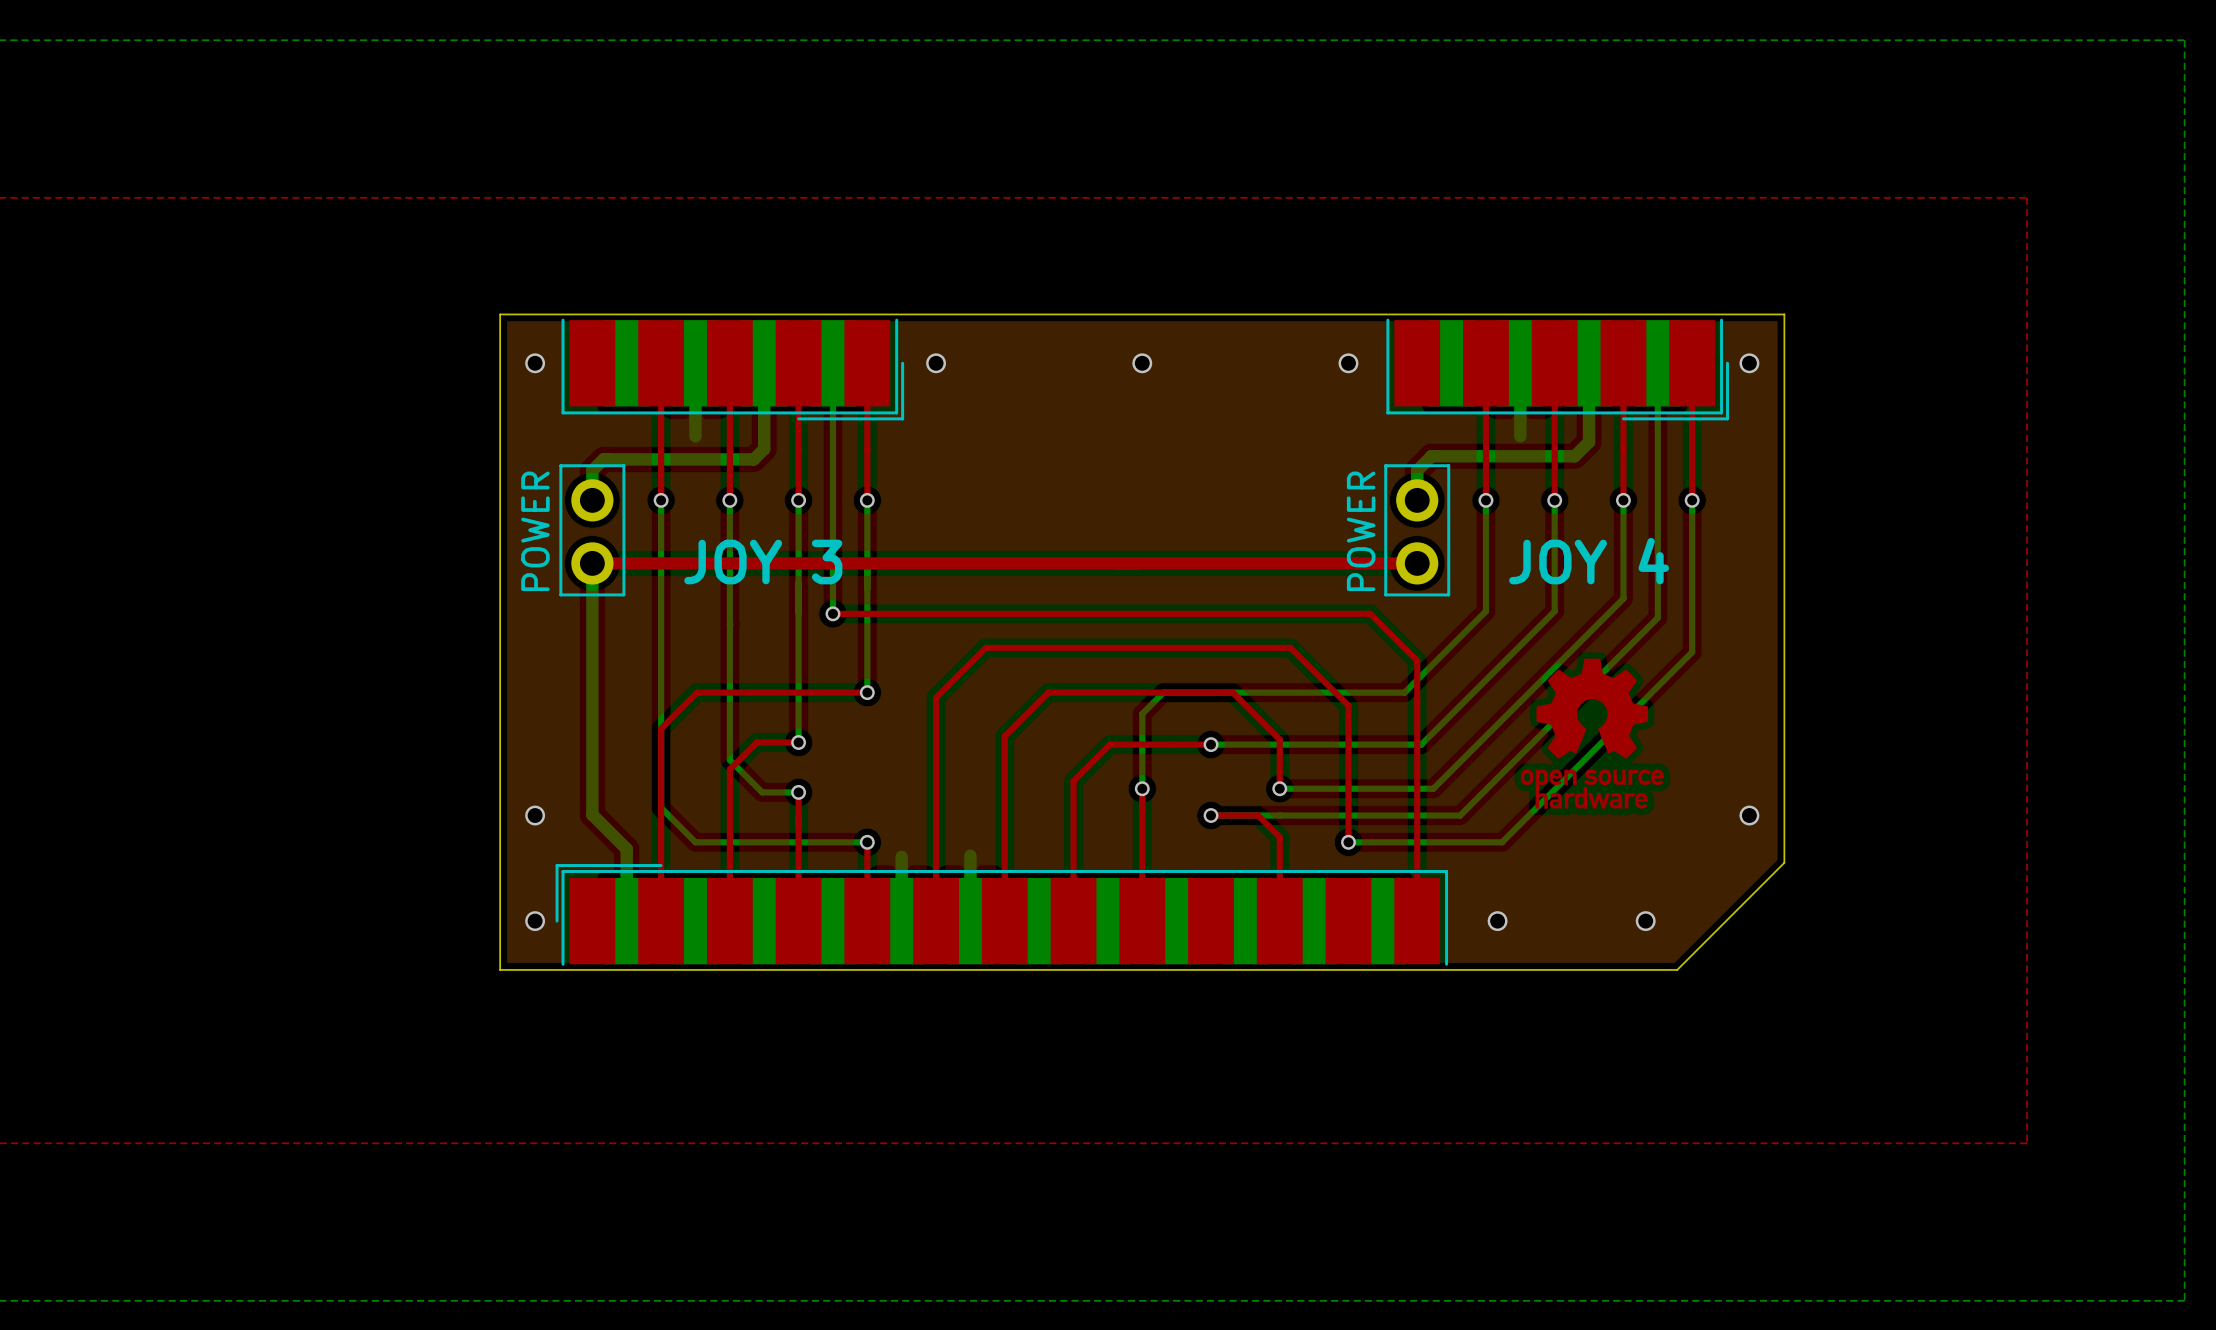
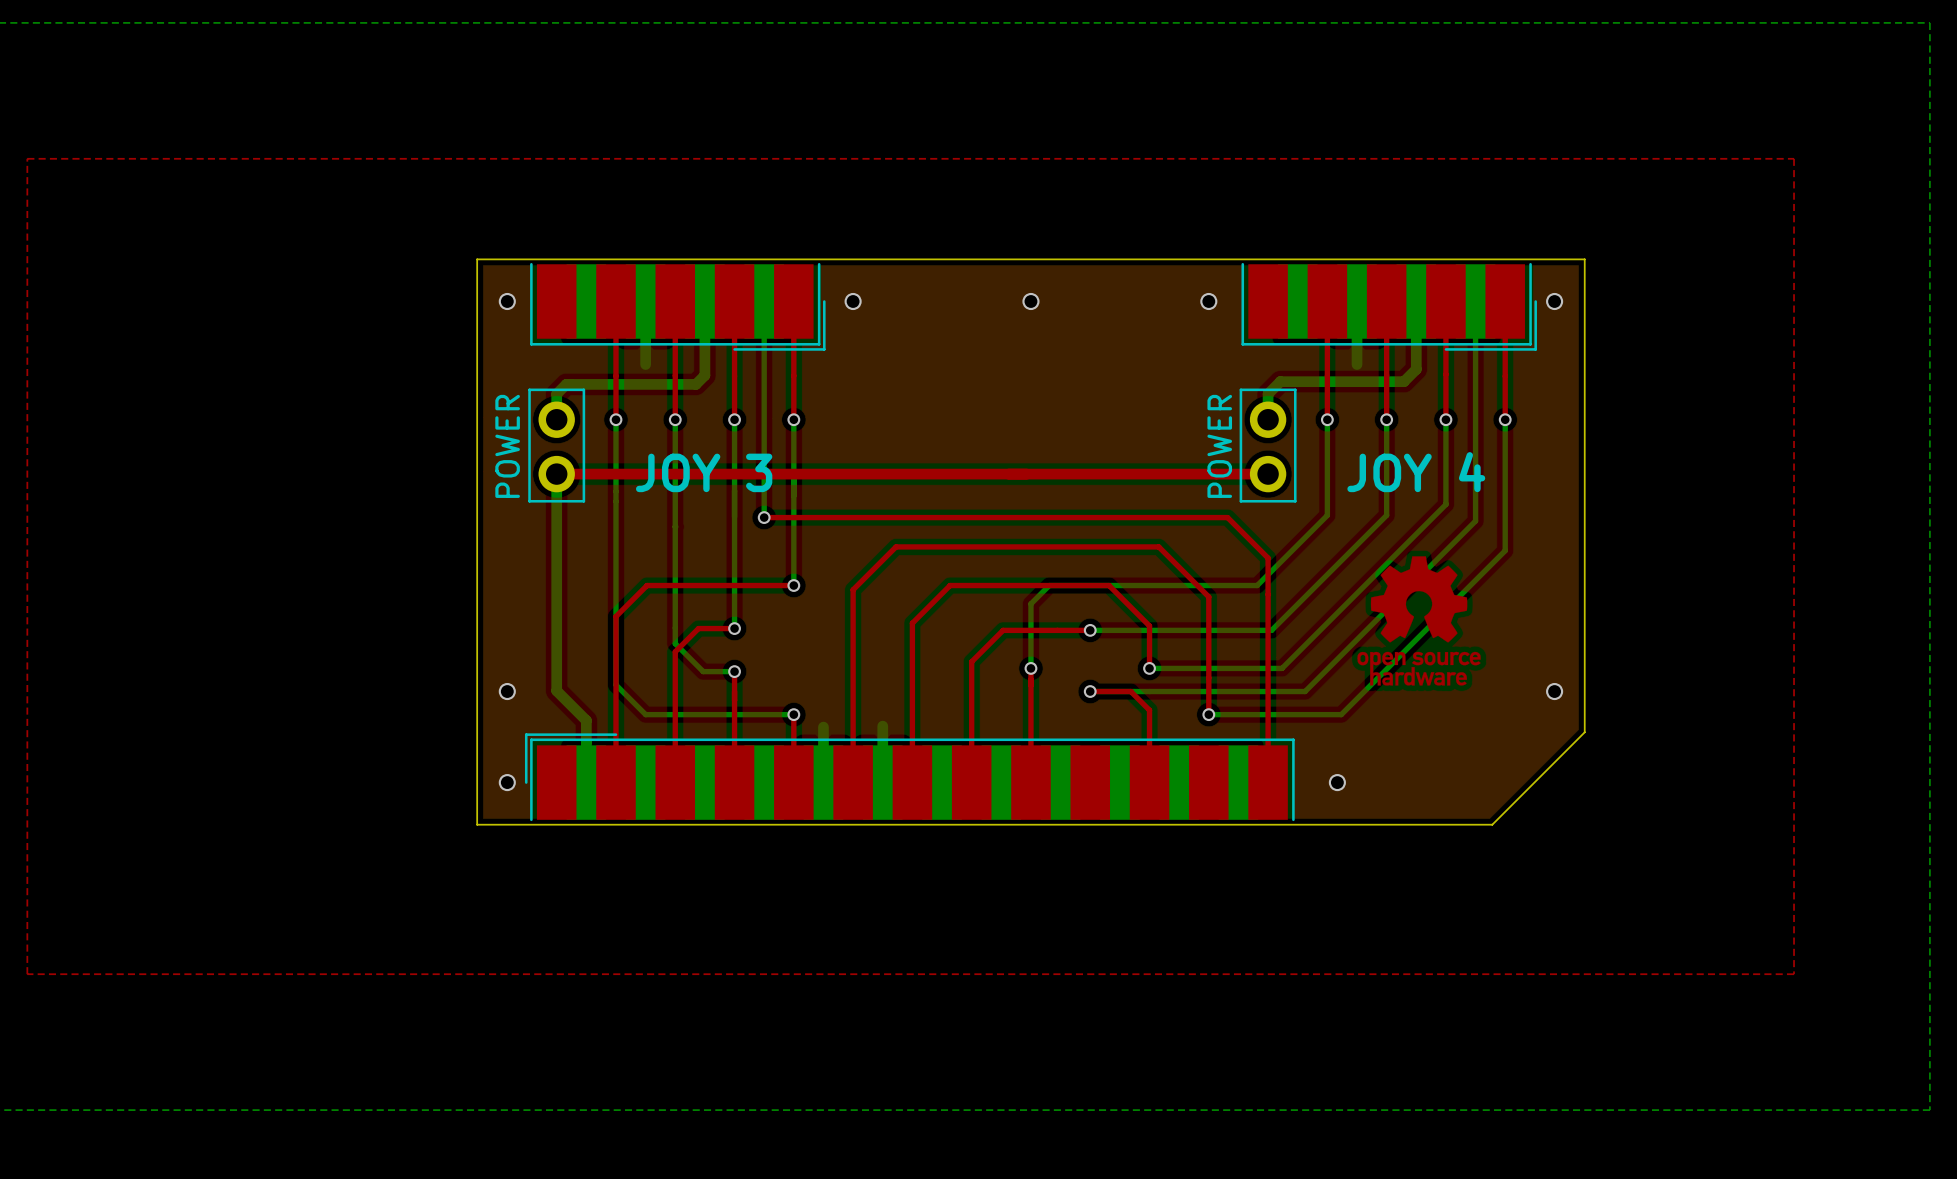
via: (1645, 921) -> none

